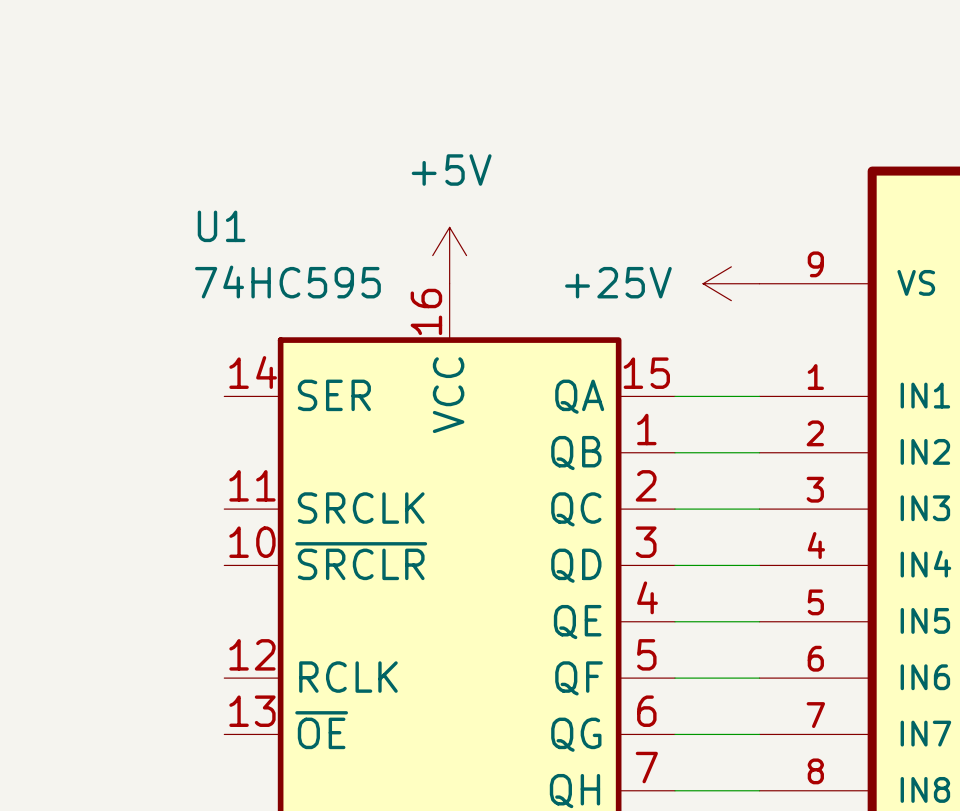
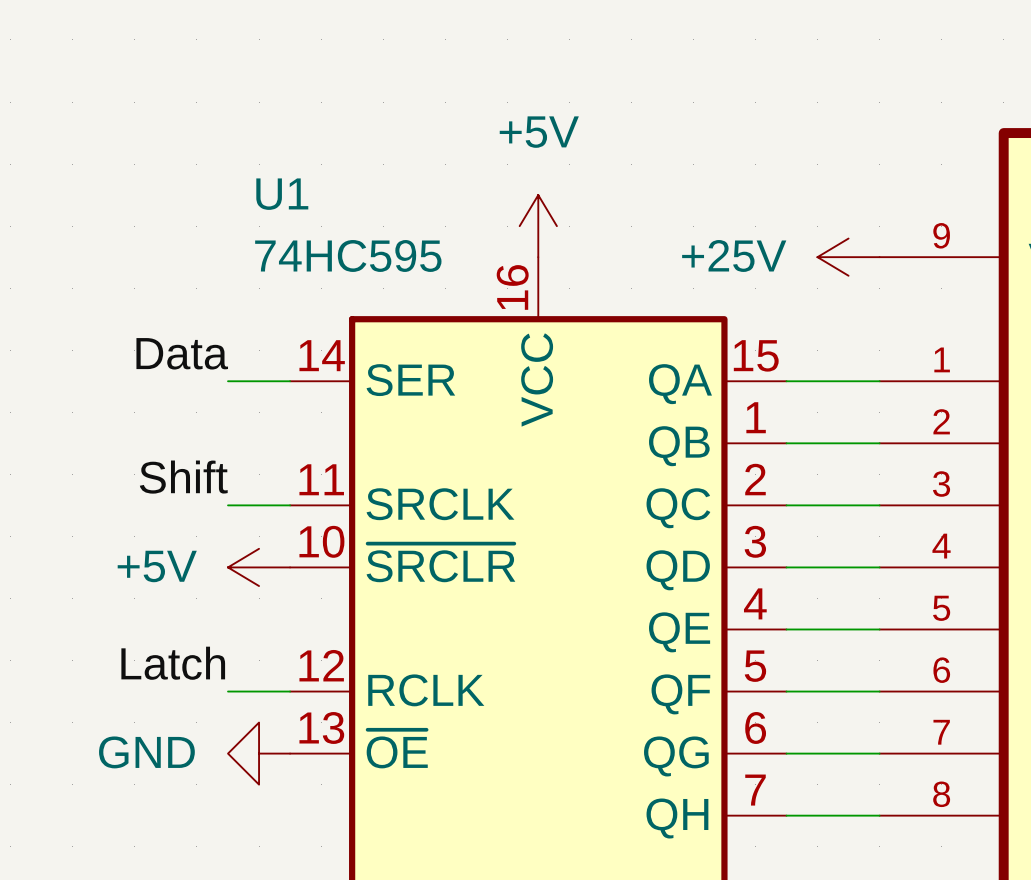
label: none -> Data (182, 353)
wire: none -> (228, 381) (290, 381)
label: none -> Shift (183, 477)
wire: none -> (228, 505) (290, 505)
power symbol: none -> +5V (259, 567)
label: none -> Latch (173, 663)
wire: none -> (228, 691) (290, 691)
power symbol: none -> GND (259, 753)

